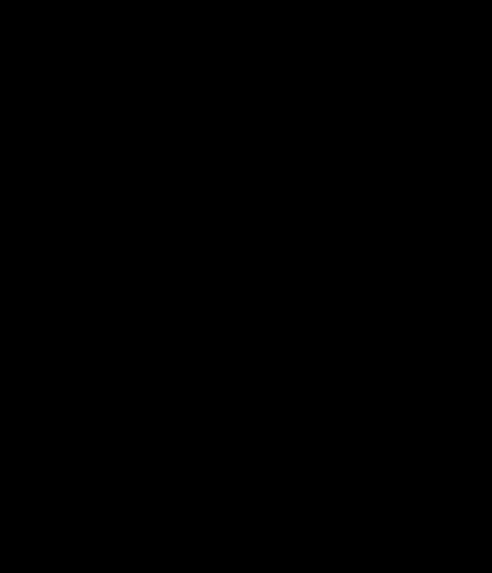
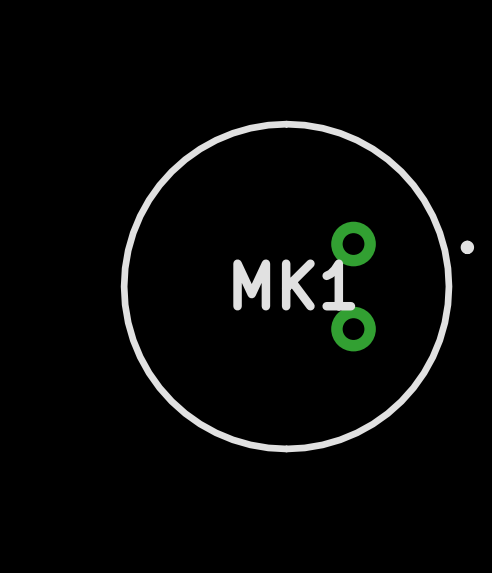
MK1: none -> (297, 286)

